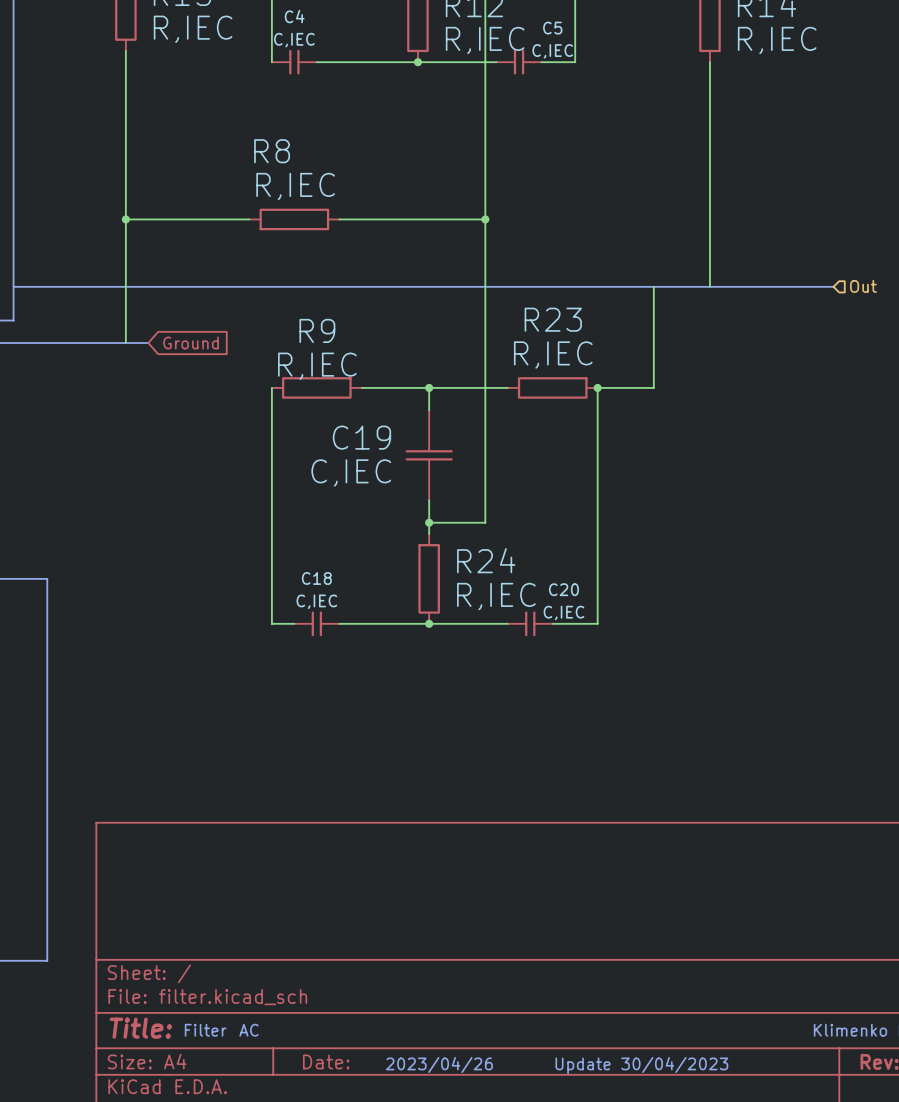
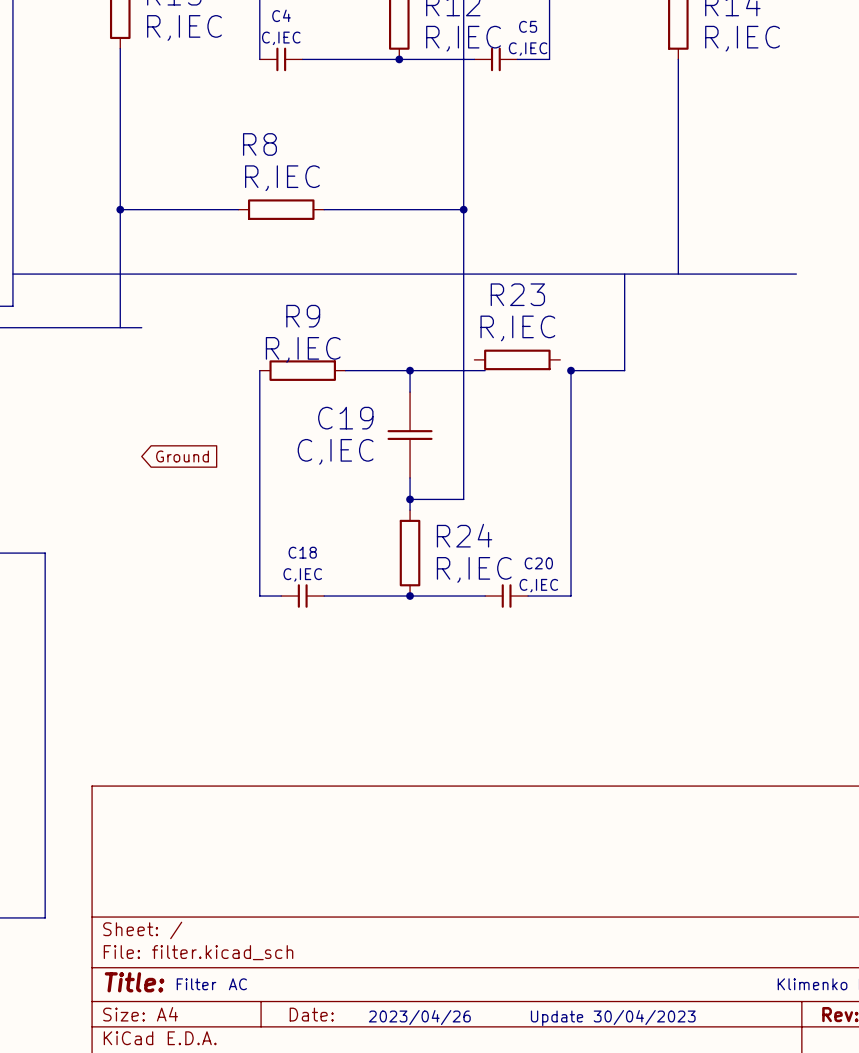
hierarchical label: Out (863, 286) -> none
global label position: Ground (191, 343) -> Ground (182, 456)
R23 position: (552, 387) -> (517, 359)

